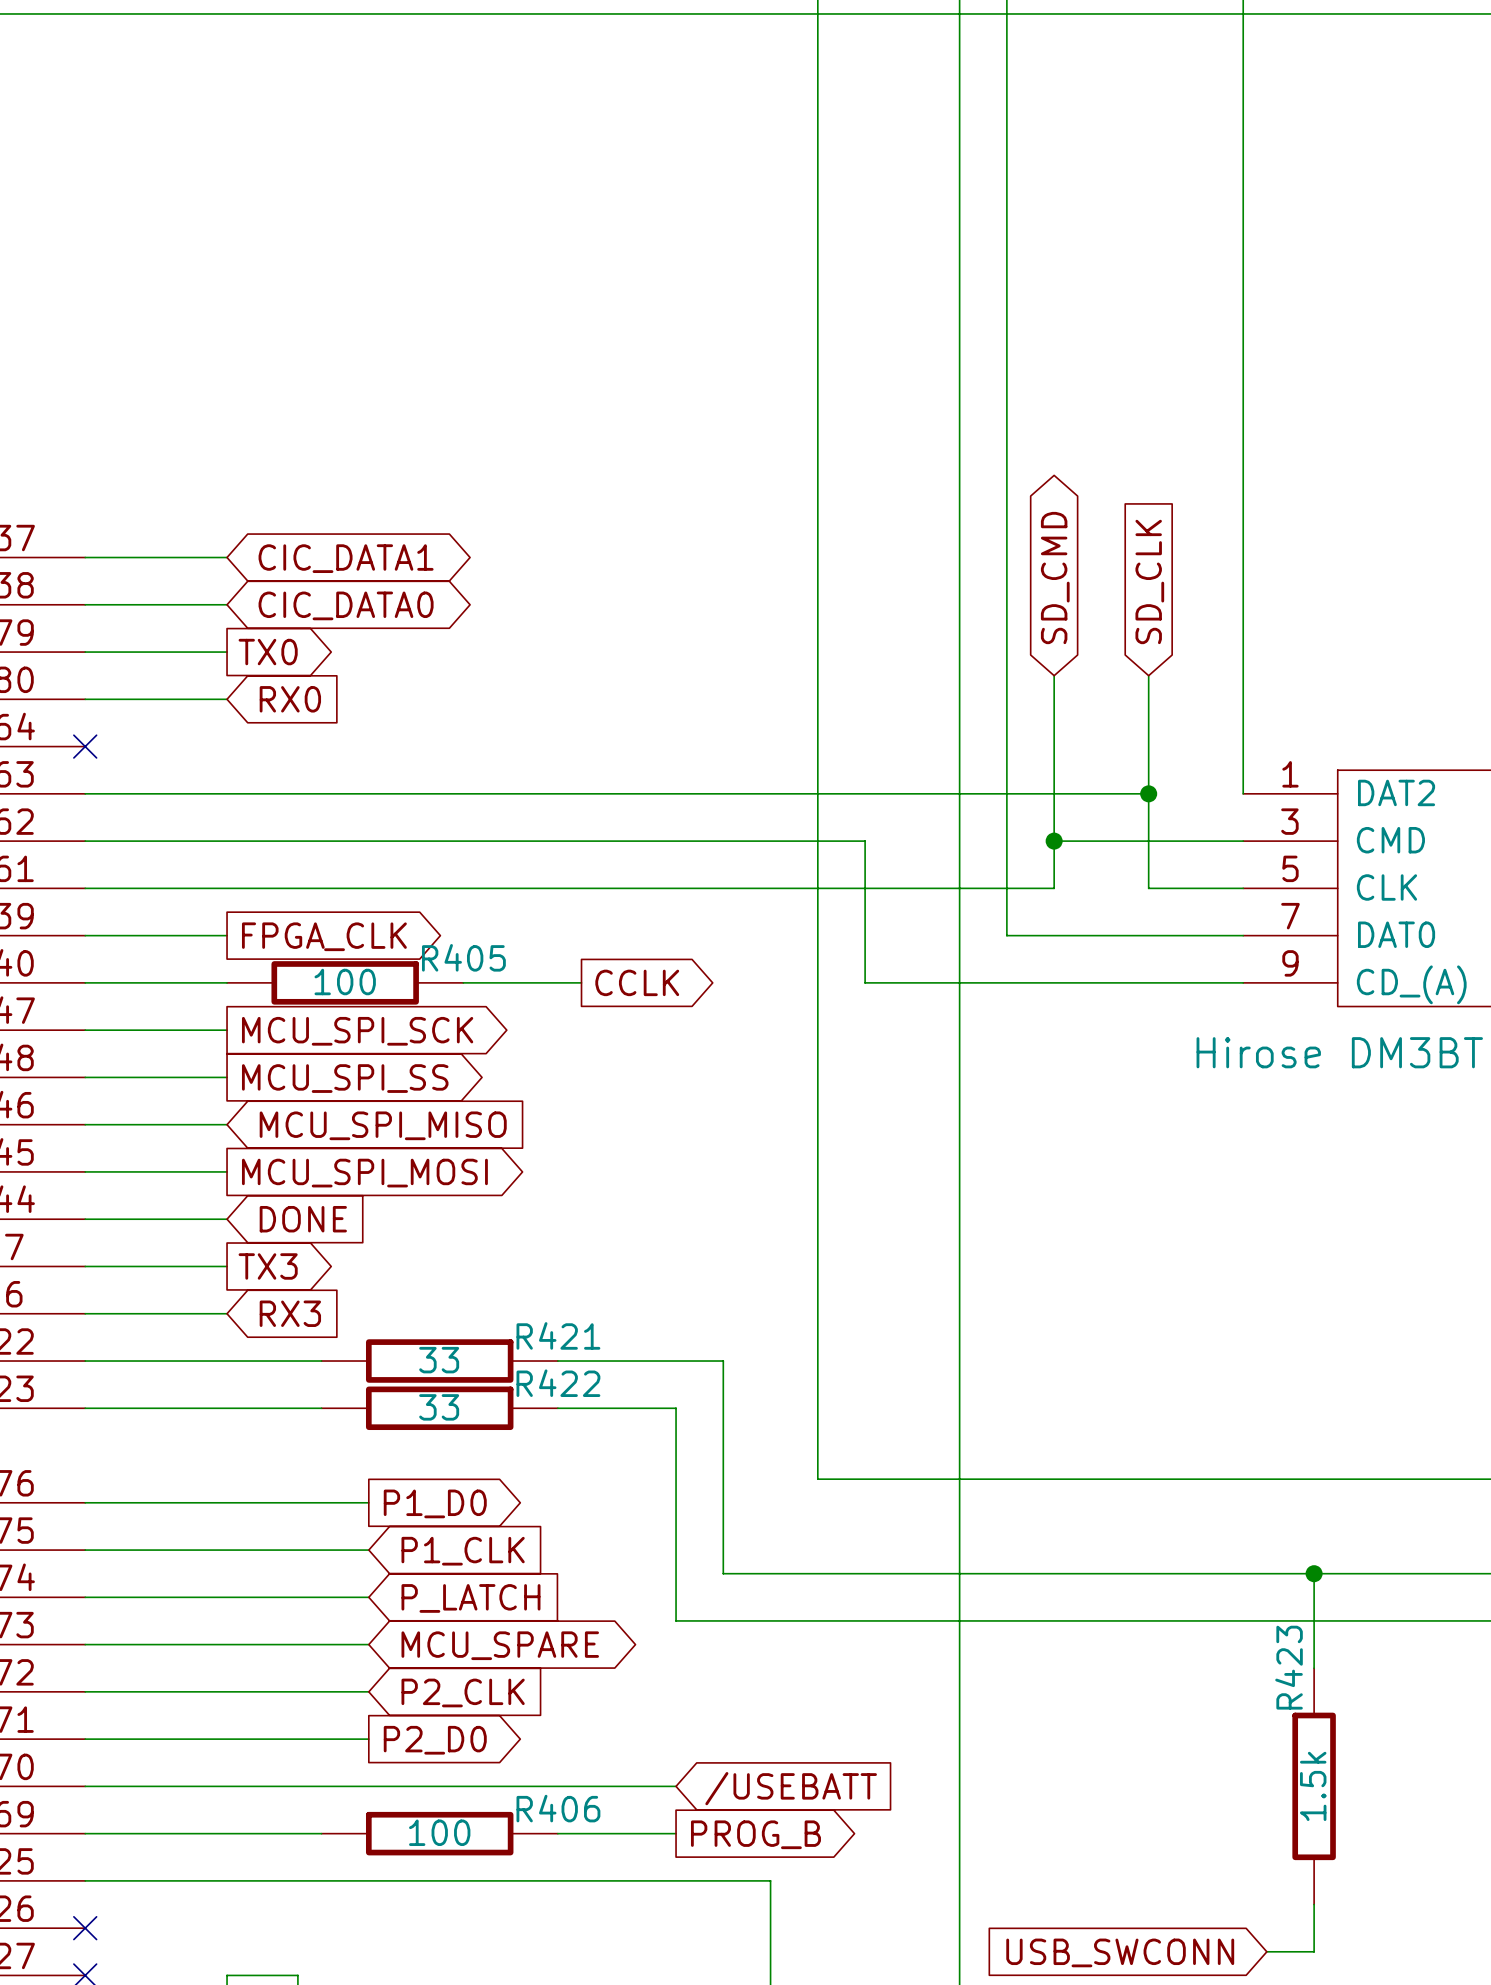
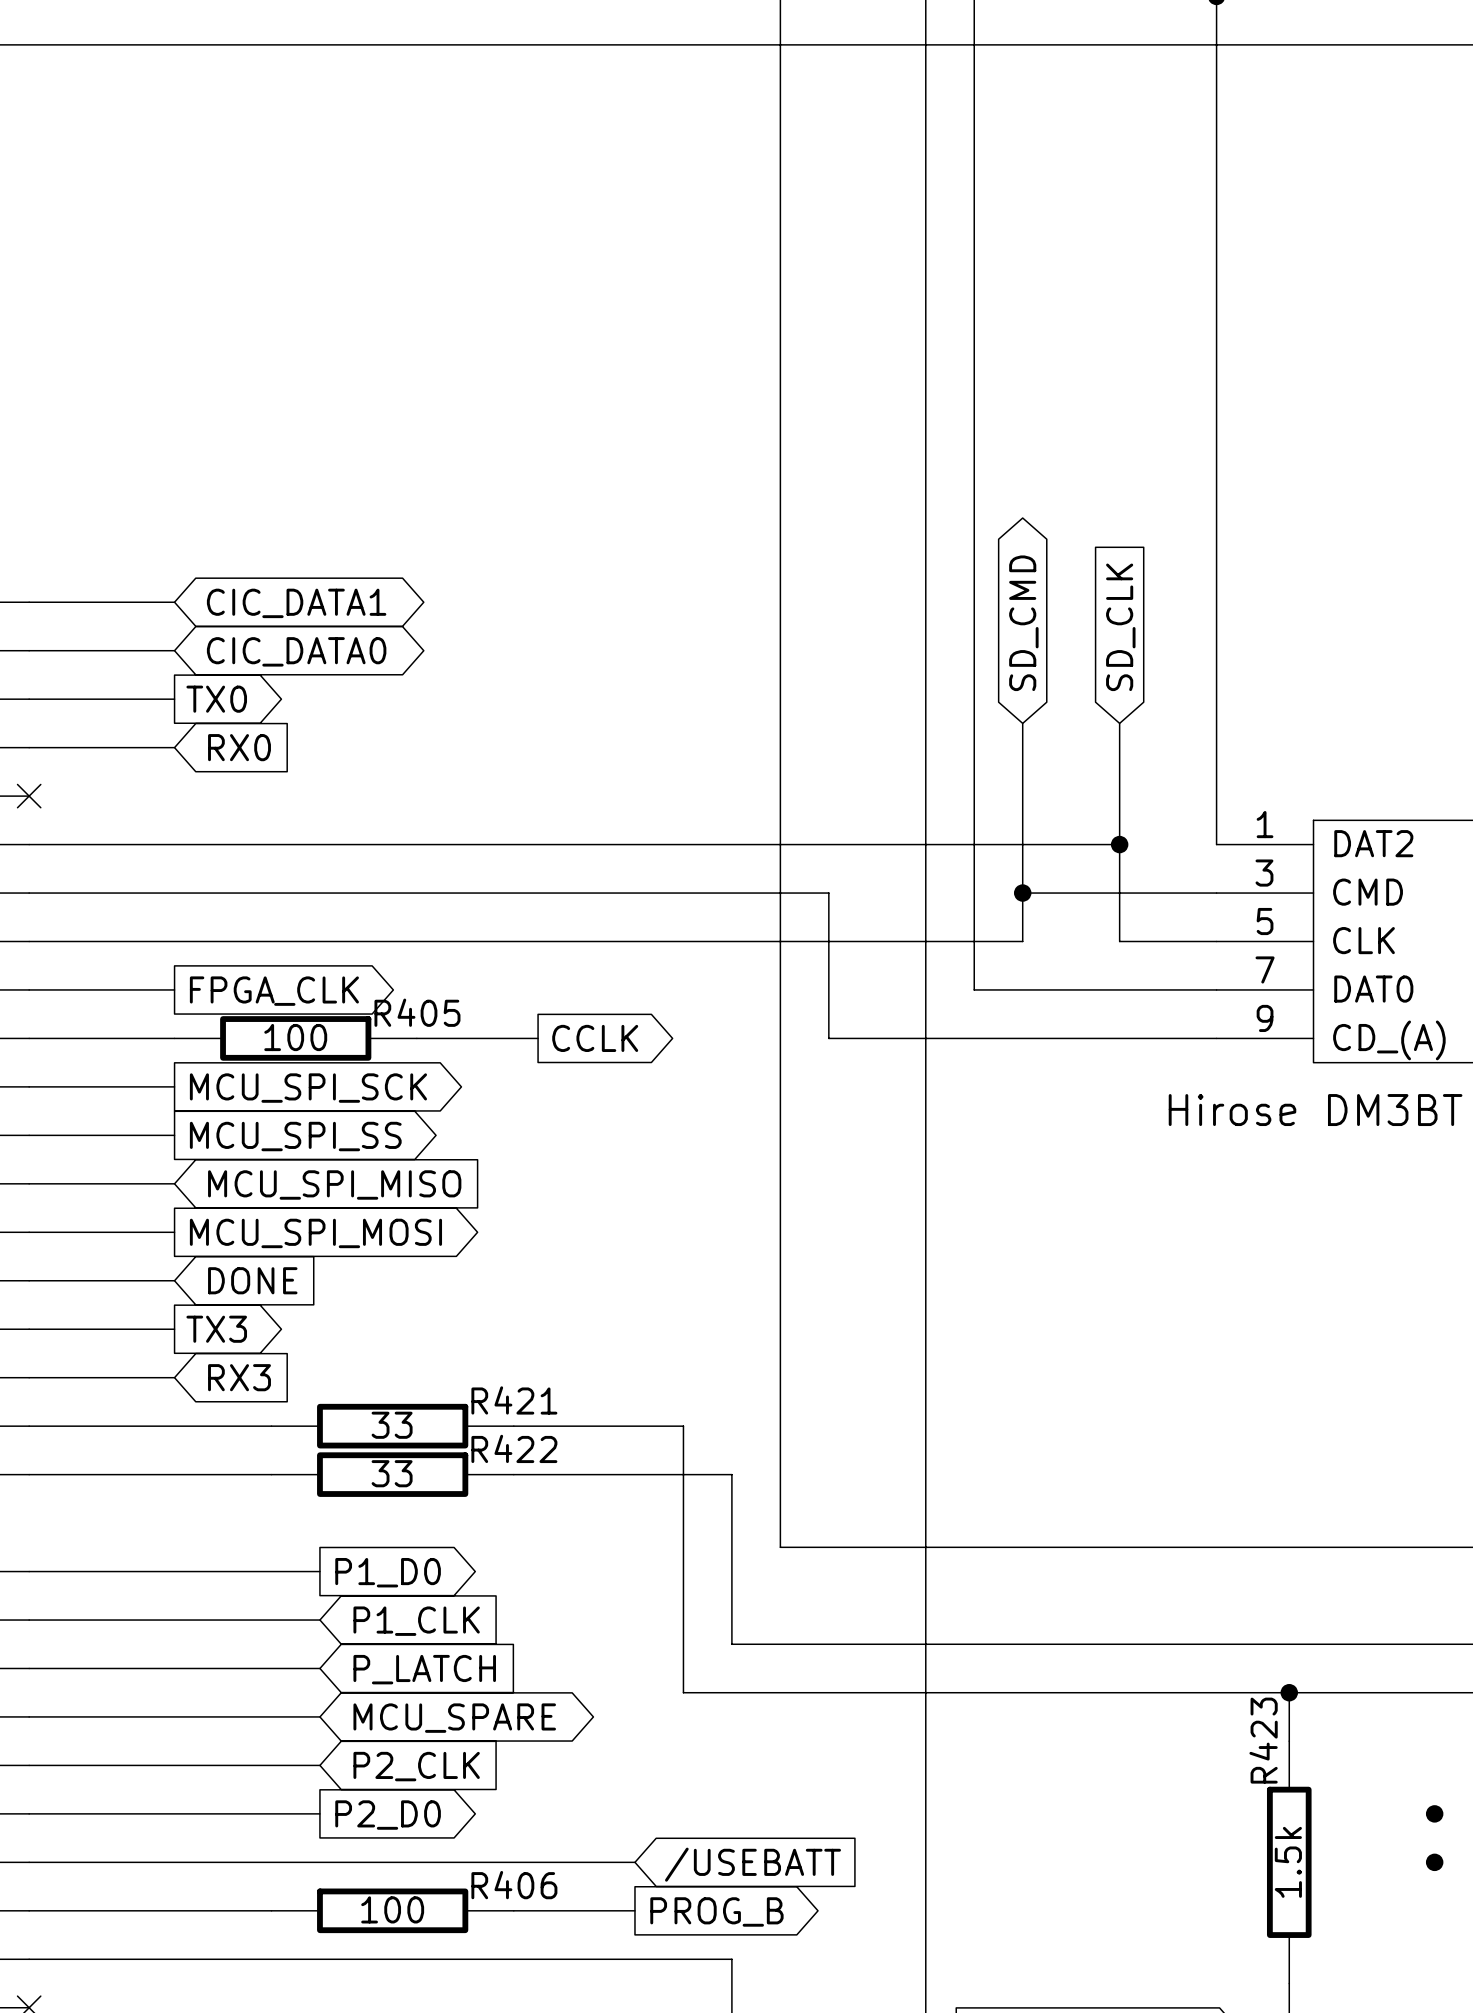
wire: (676, 1408) (676, 1620) (723, 1620) -> (634, 1474) (731, 1474) (731, 1644)
wire: (723, 1573) (770, 1573) -> (683, 1644) (683, 1692)
wire: (1314, 1573) (1314, 1620) -> none
junction position: (1314, 1573) -> (1289, 1692)
junction: none -> (1434, 1813)
junction: none -> (1434, 1862)

